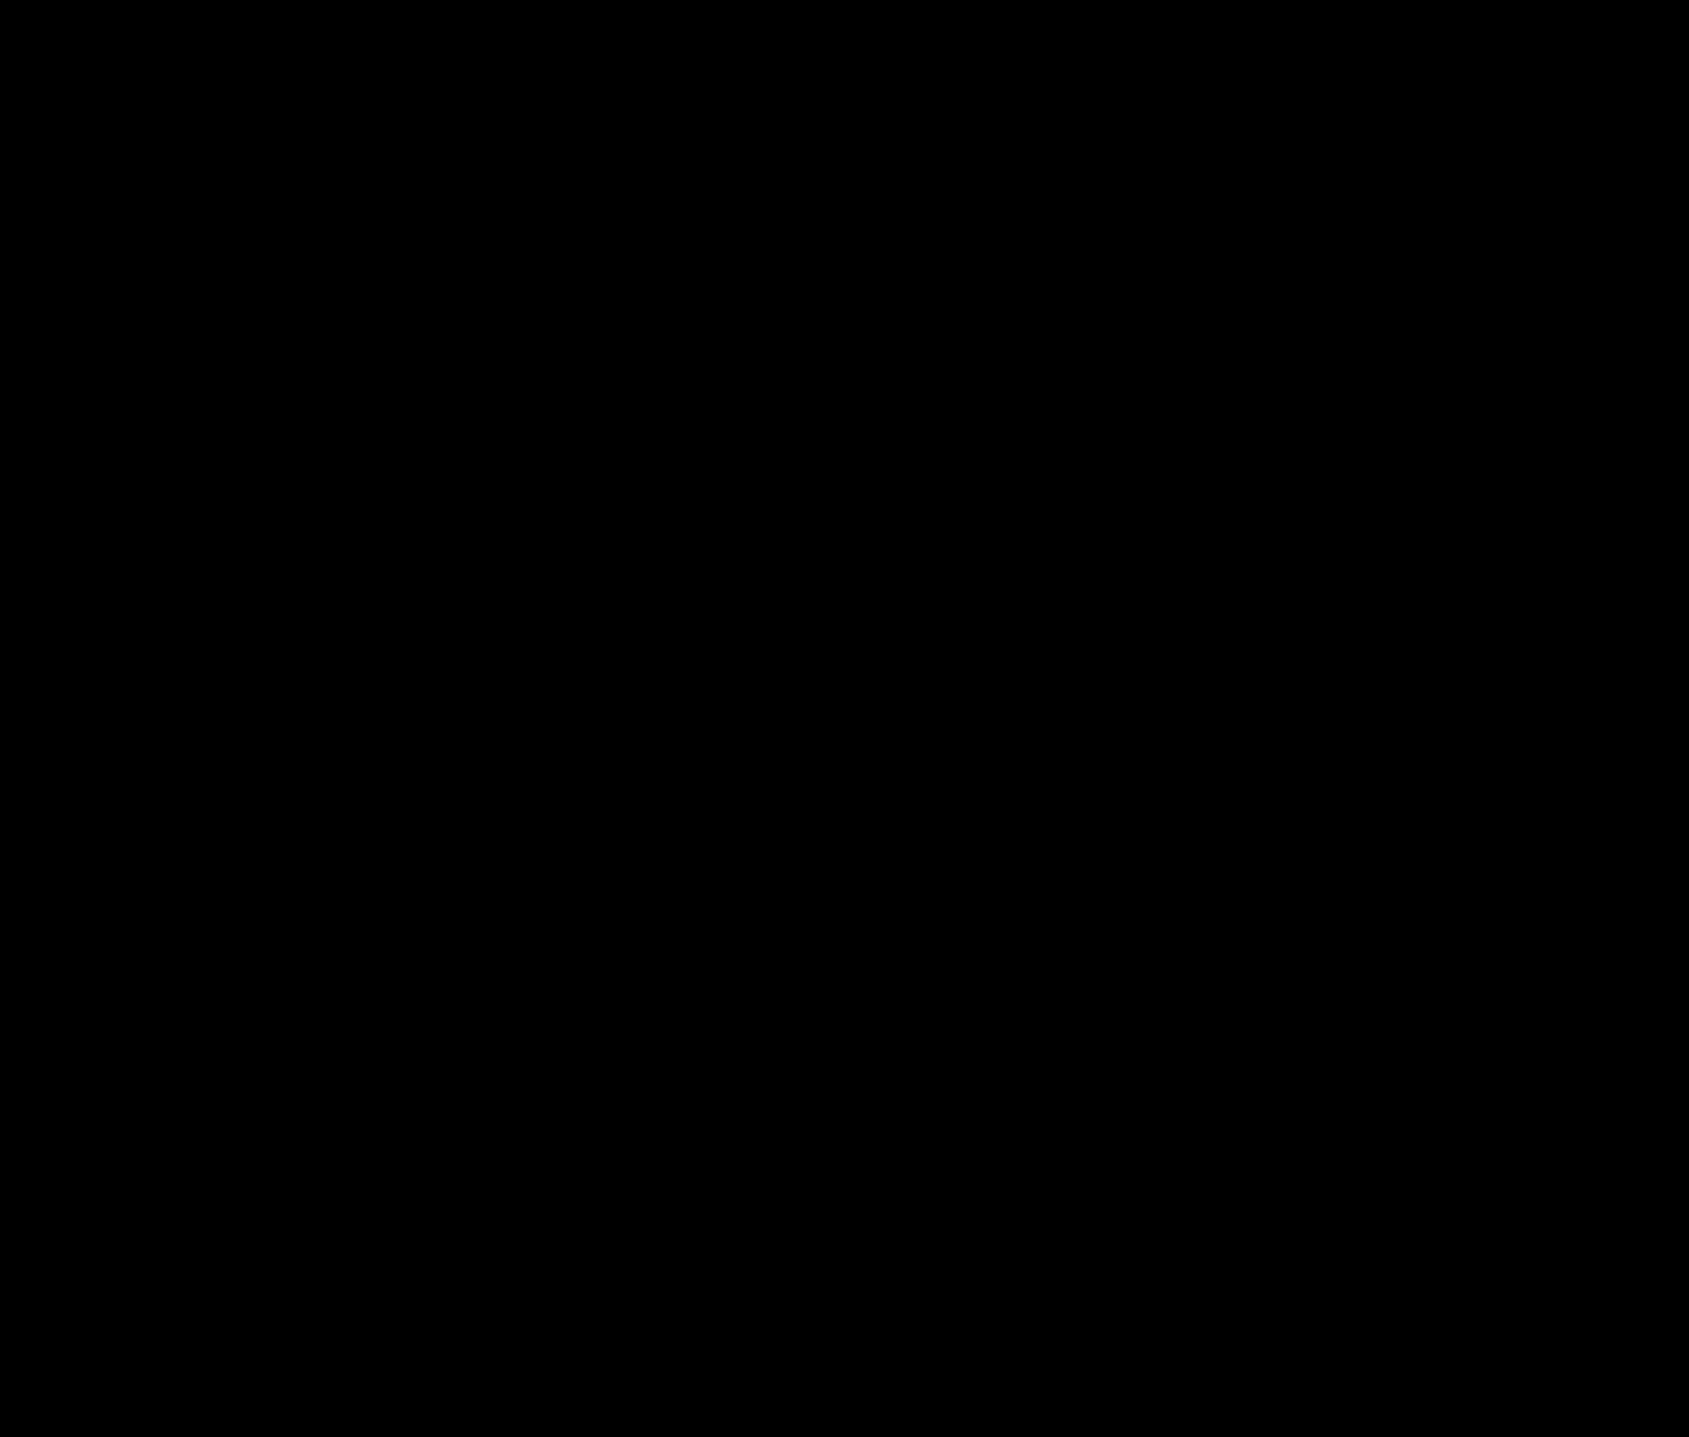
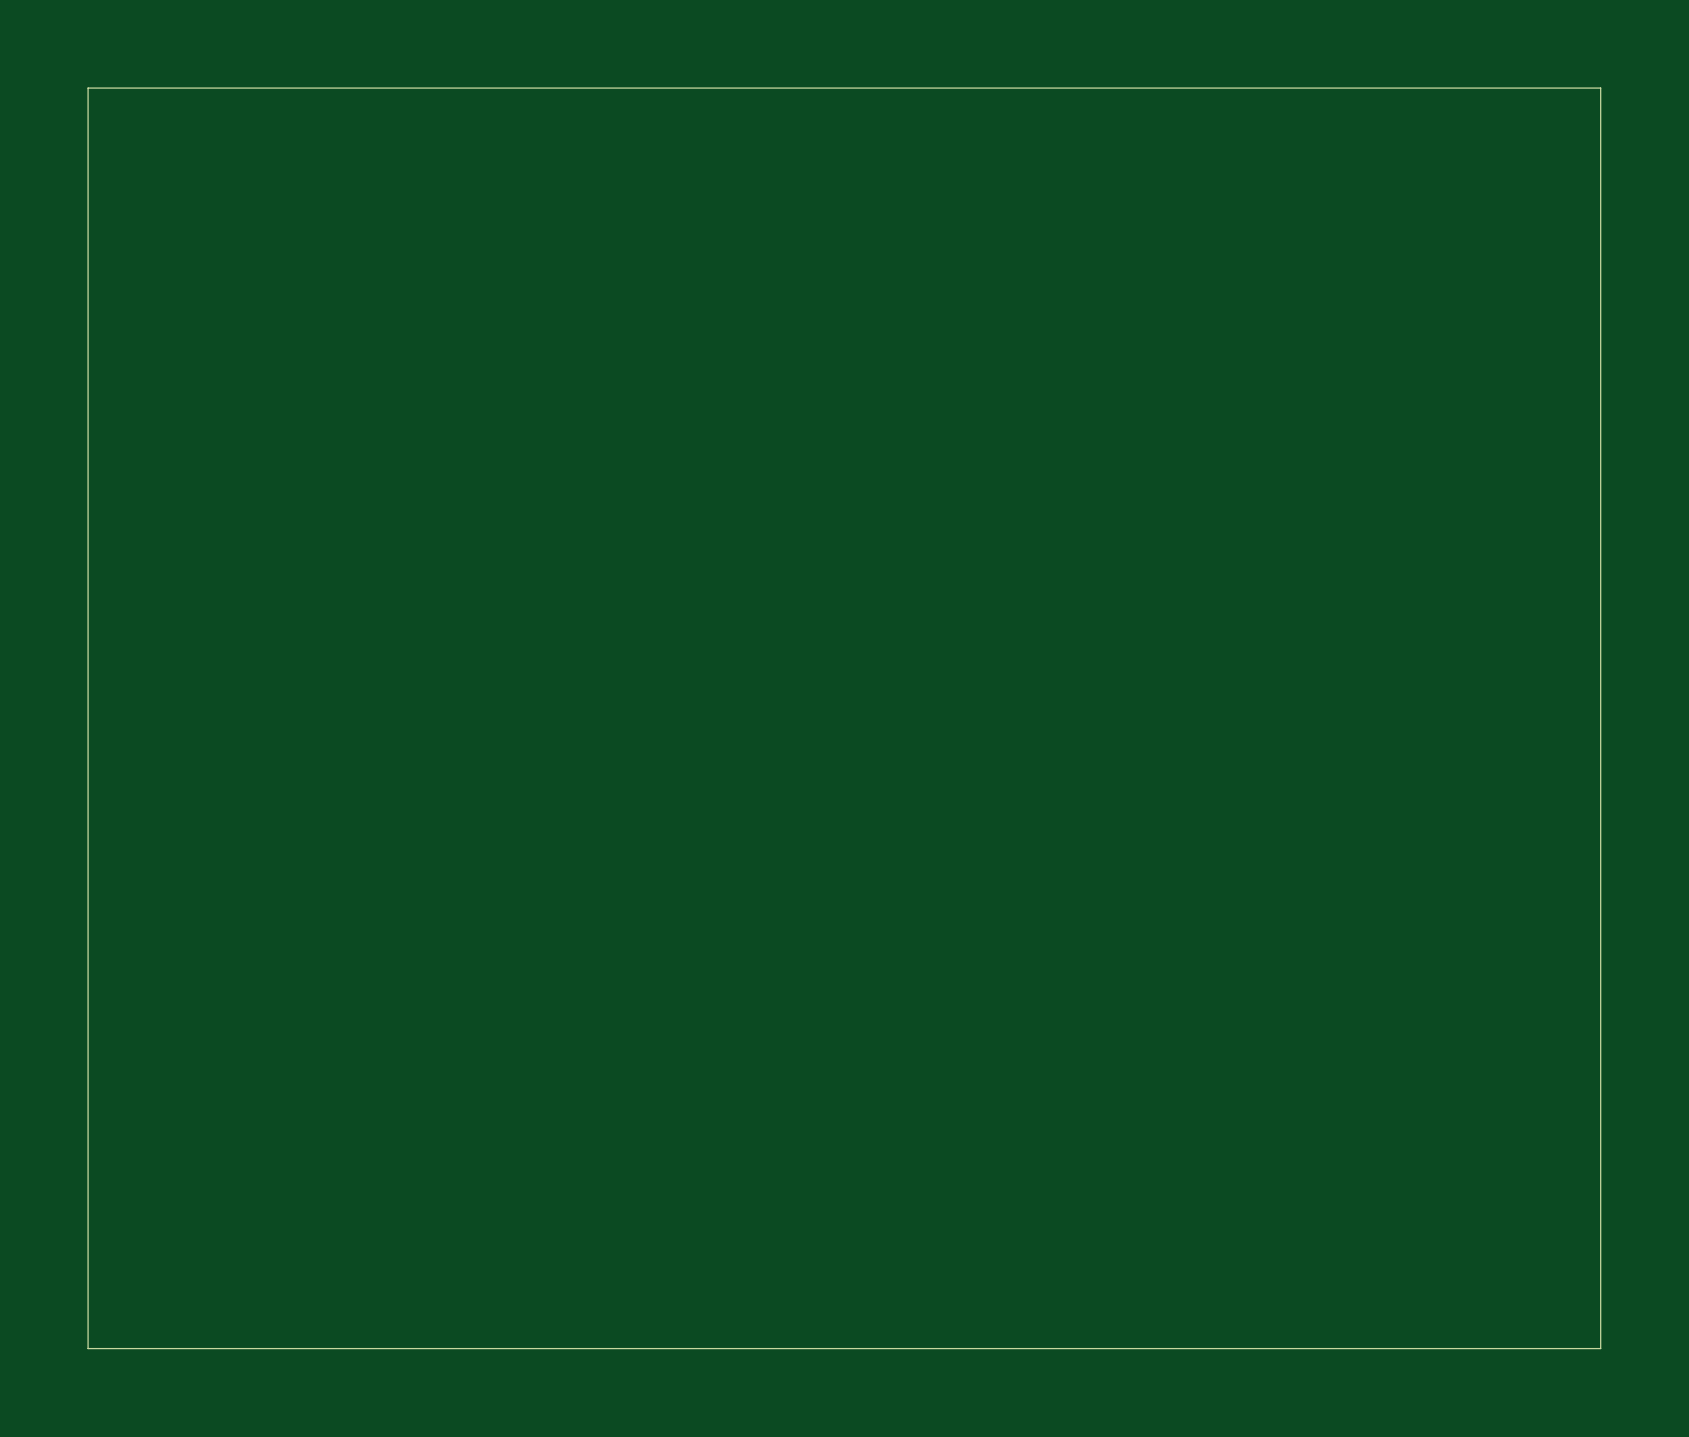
board edge: none -> (1600, 88) (88, 88) (88, 1348) (1600, 1348) (1600, 88)

